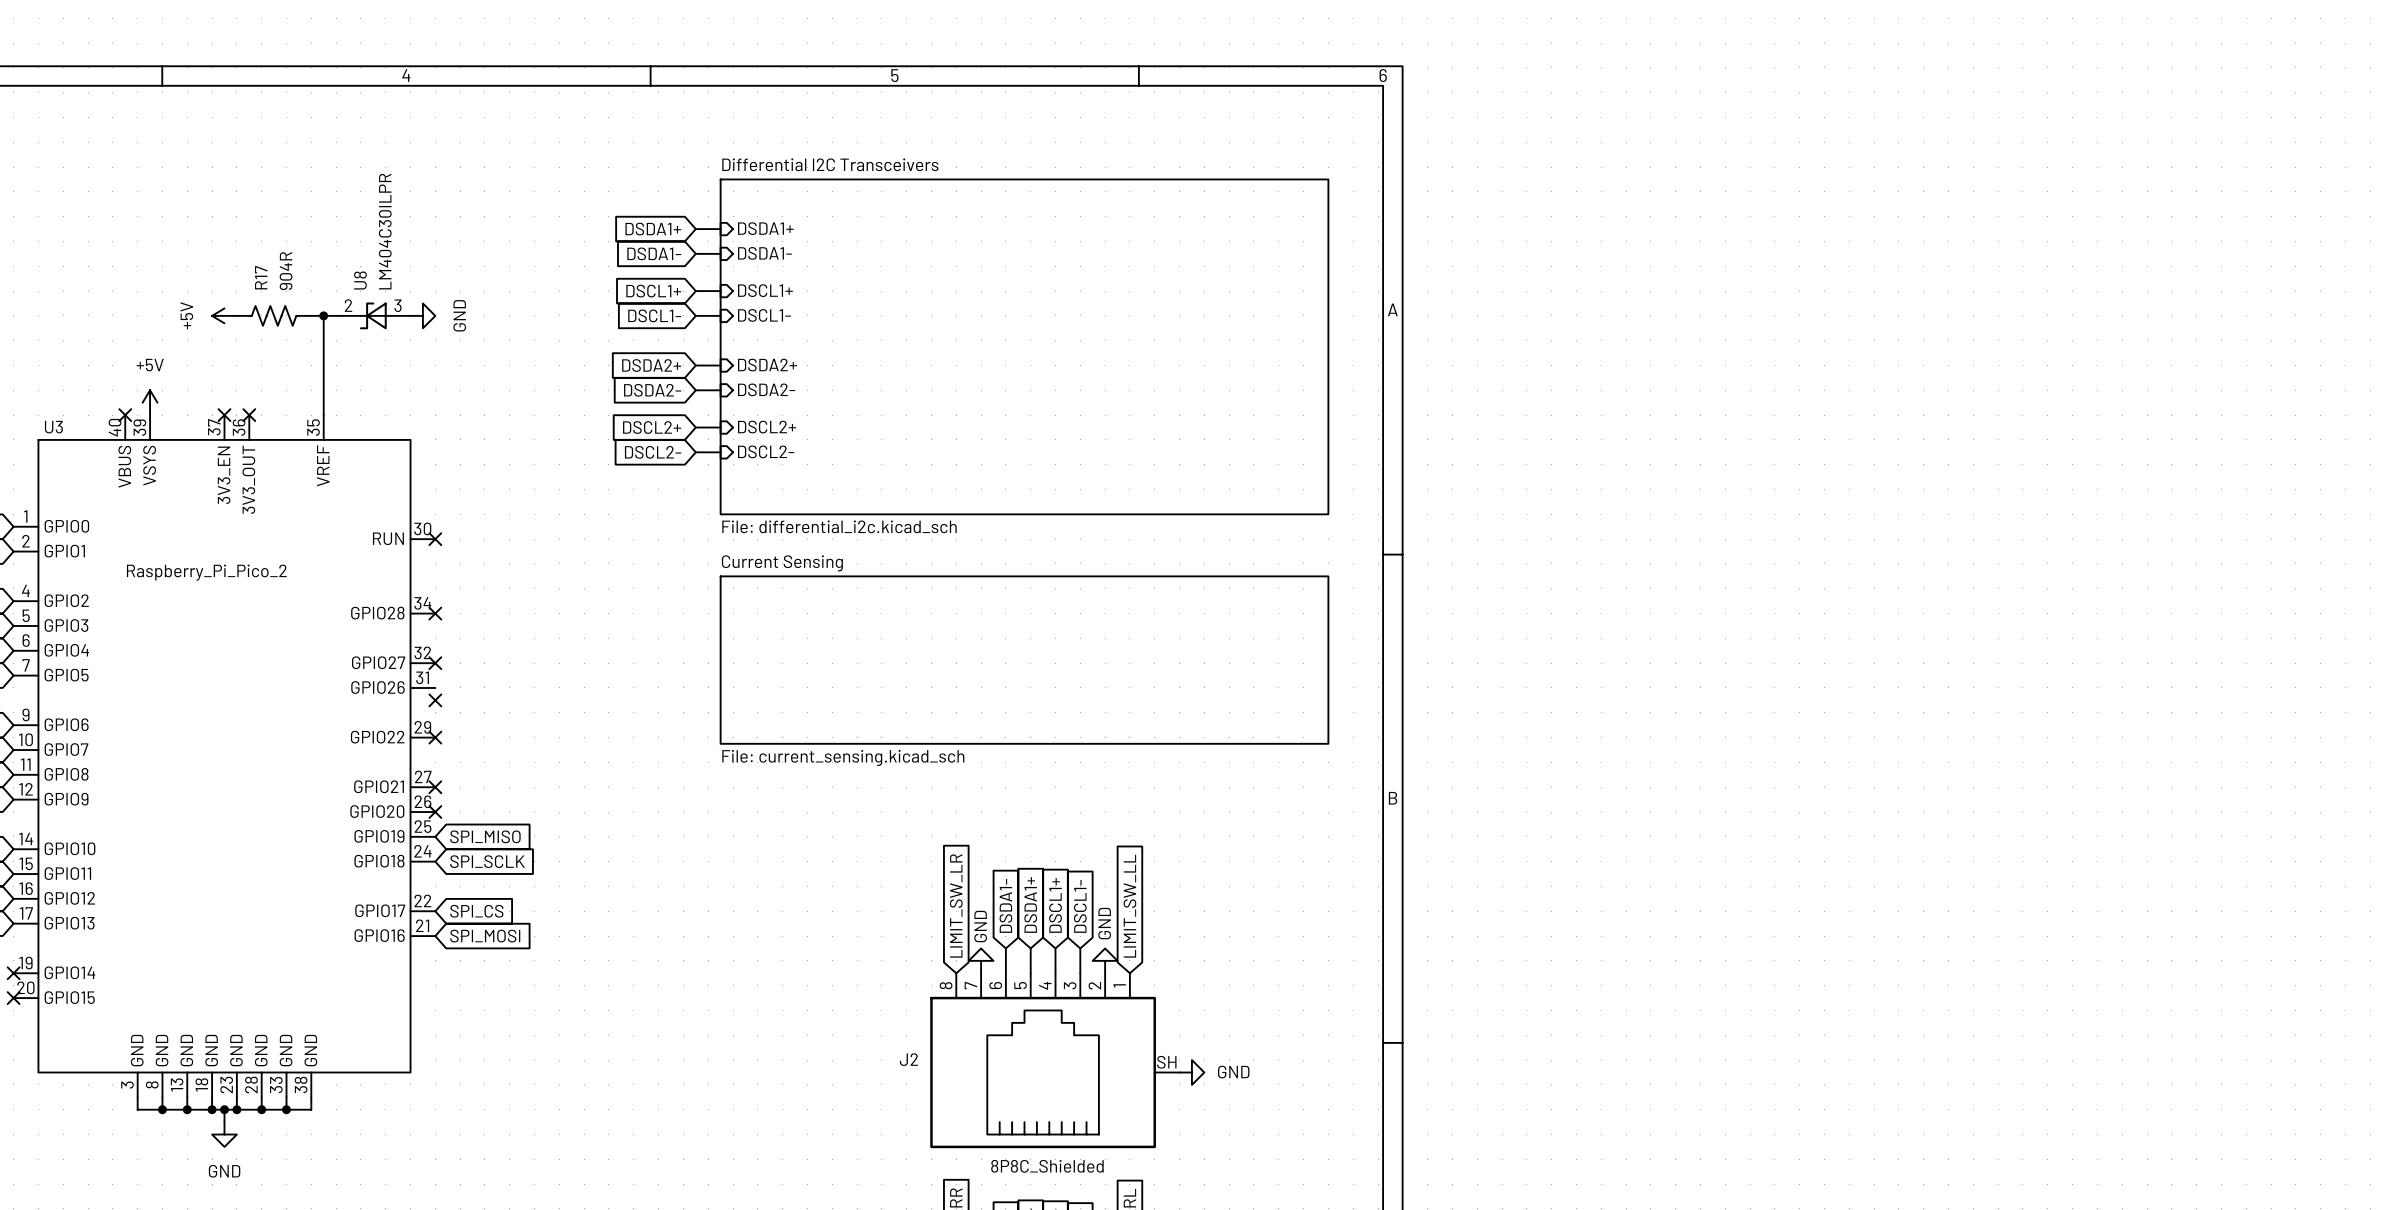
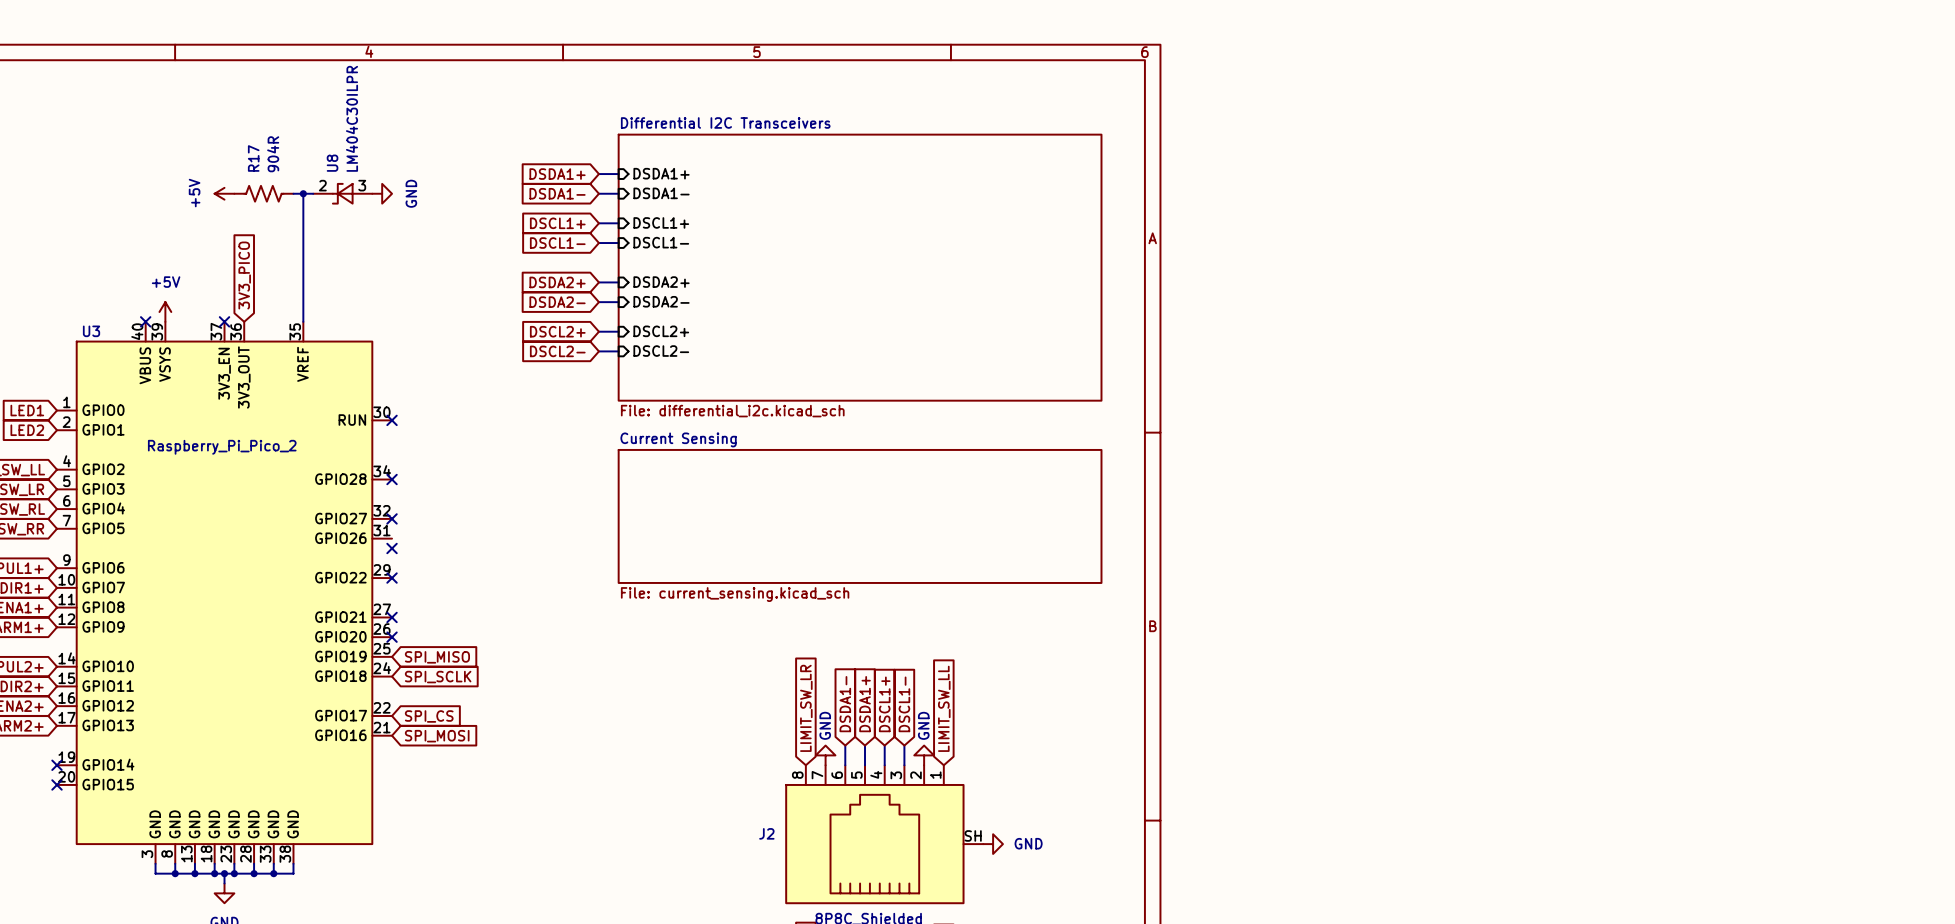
wire: none -> (303, 193) (303, 243)
junction: none -> (303, 193)
power symbol position: +5V (224, 315) -> +5V (224, 193)
R17 position: (274, 315) -> (263, 193)
wire: (311, 315) (336, 315) -> (293, 193) (313, 193)
junction: (323, 315) -> none
U8 position: (373, 315) -> (342, 193)
power symbol position: GND (422, 315) -> GND (382, 193)
global label: none -> 3V3_PICO (244, 275)
no-connect mark: (249, 415) -> none

